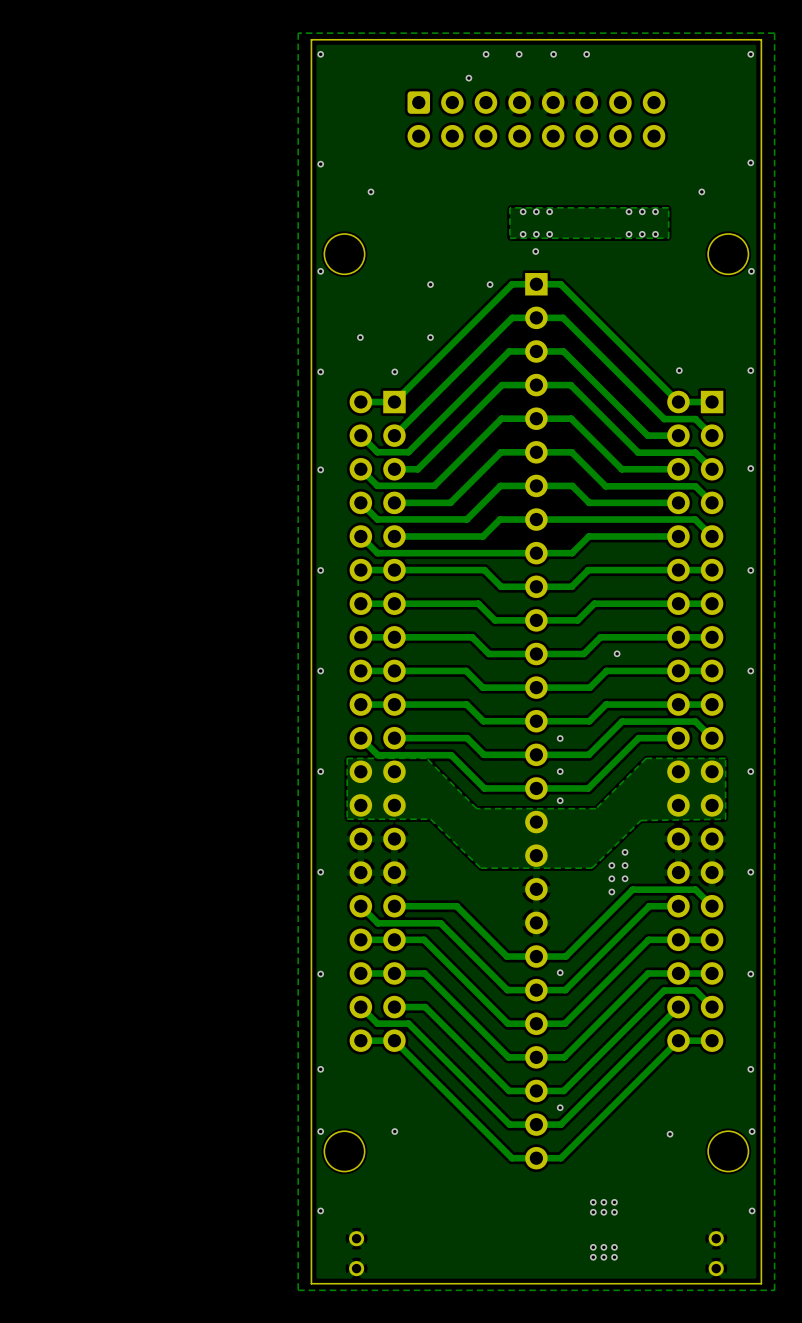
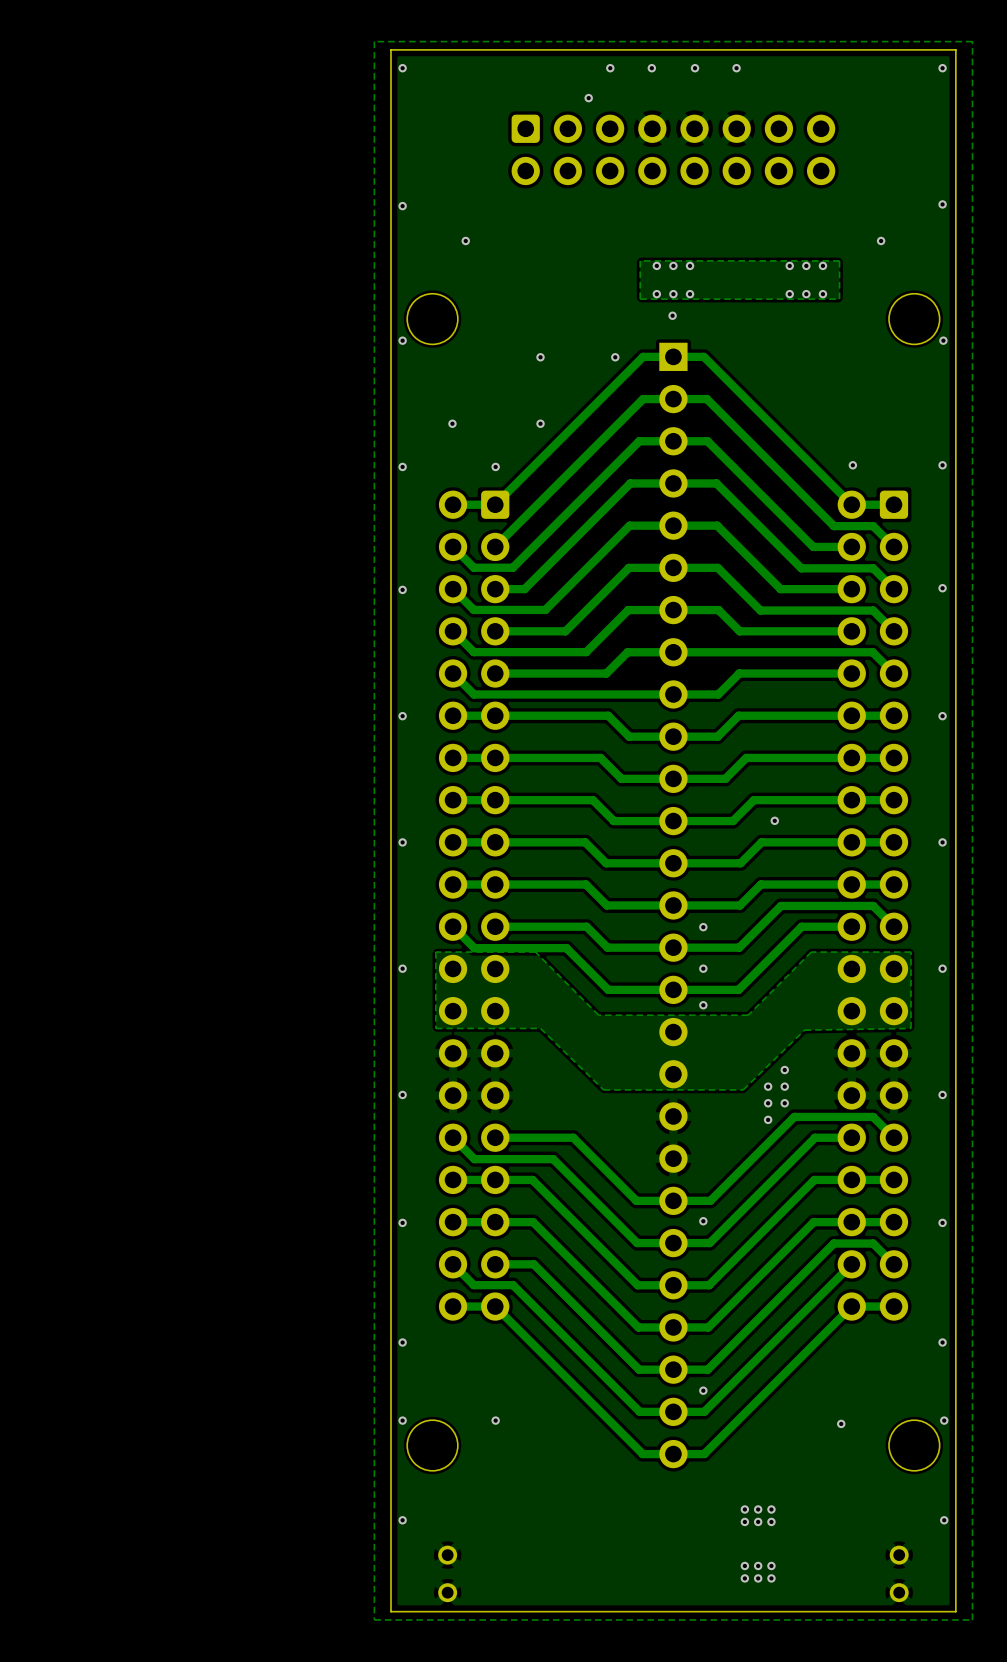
part footprint: [349, 390, 406, 1052] -> [438, 490, 510, 1321]
part footprint: [667, 390, 724, 1052] -> [837, 490, 909, 1321]

